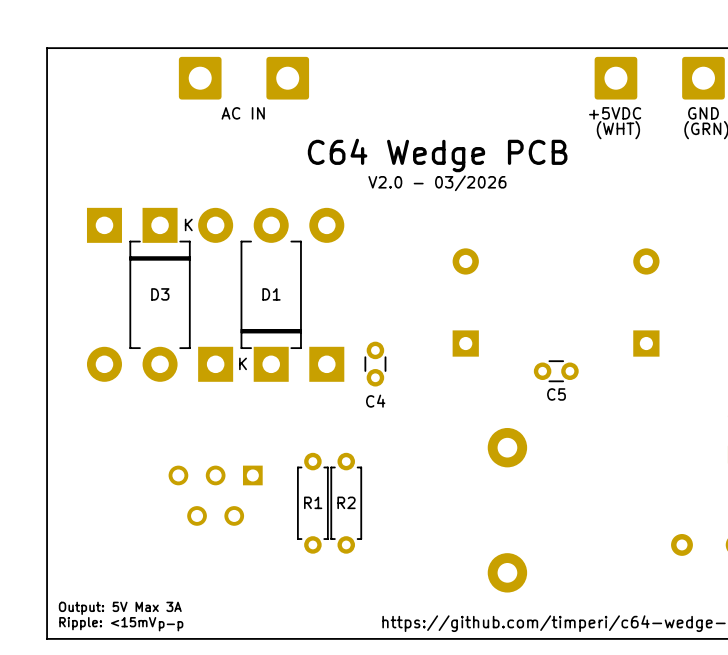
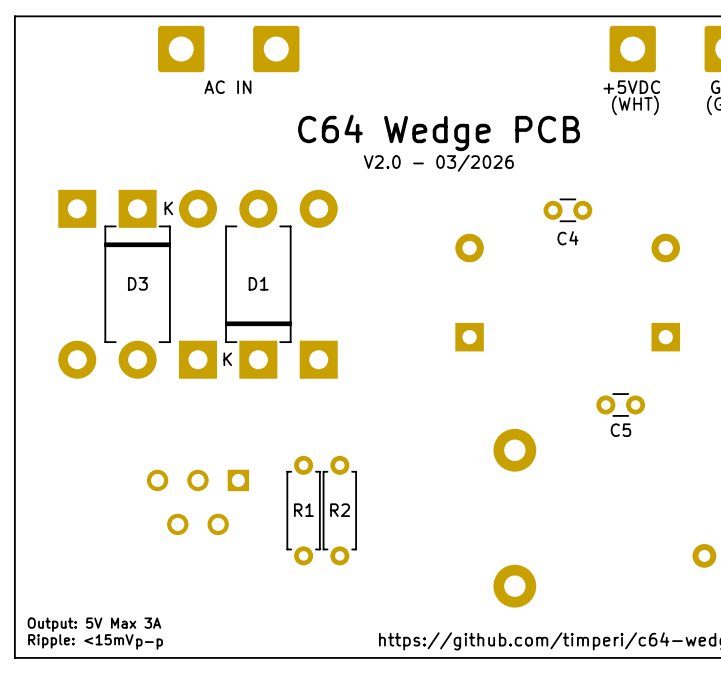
C4 rotation: 0° (375, 364) -> 90° clockwise (567, 210)
C4 position: (375, 364) -> (567, 210)
C5 position: (556, 371) -> (620, 404)

